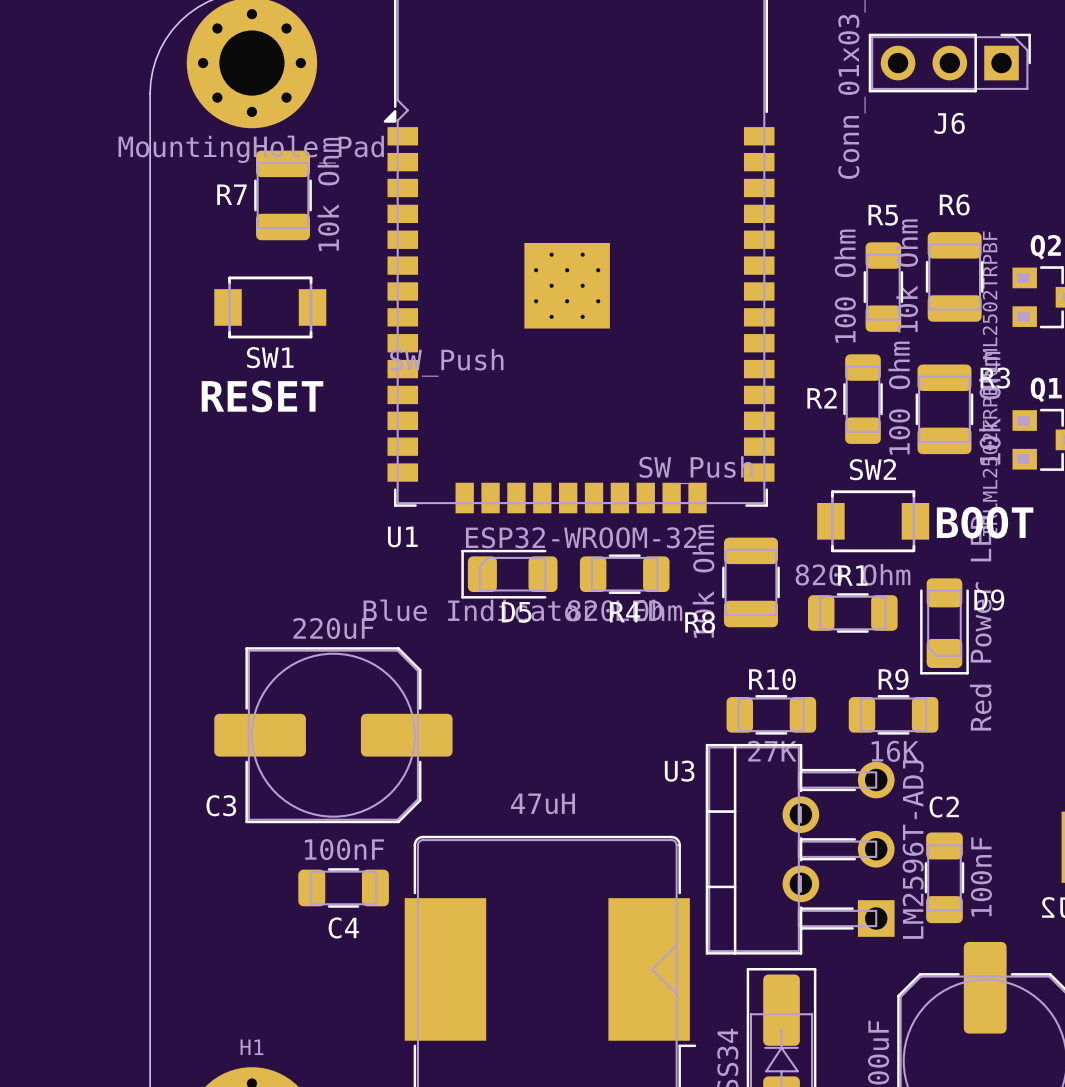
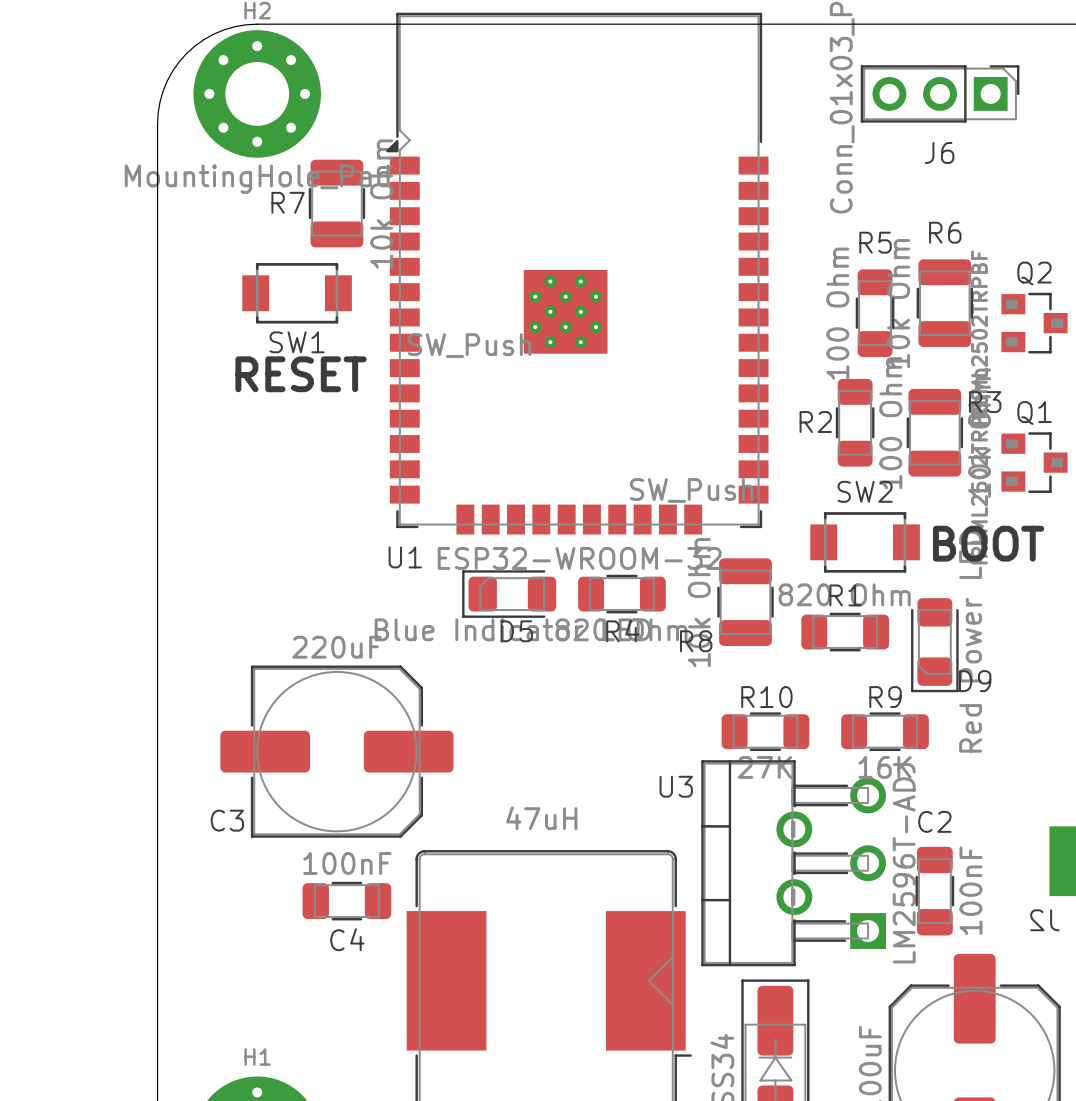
R7 position: (283, 195) -> (336, 203)
SW1 position: (270, 307) -> (297, 293)
text position: RESET (262, 396) -> RESET (301, 374)
D9 name position: D9 (989, 600) -> D9 (975, 681)

